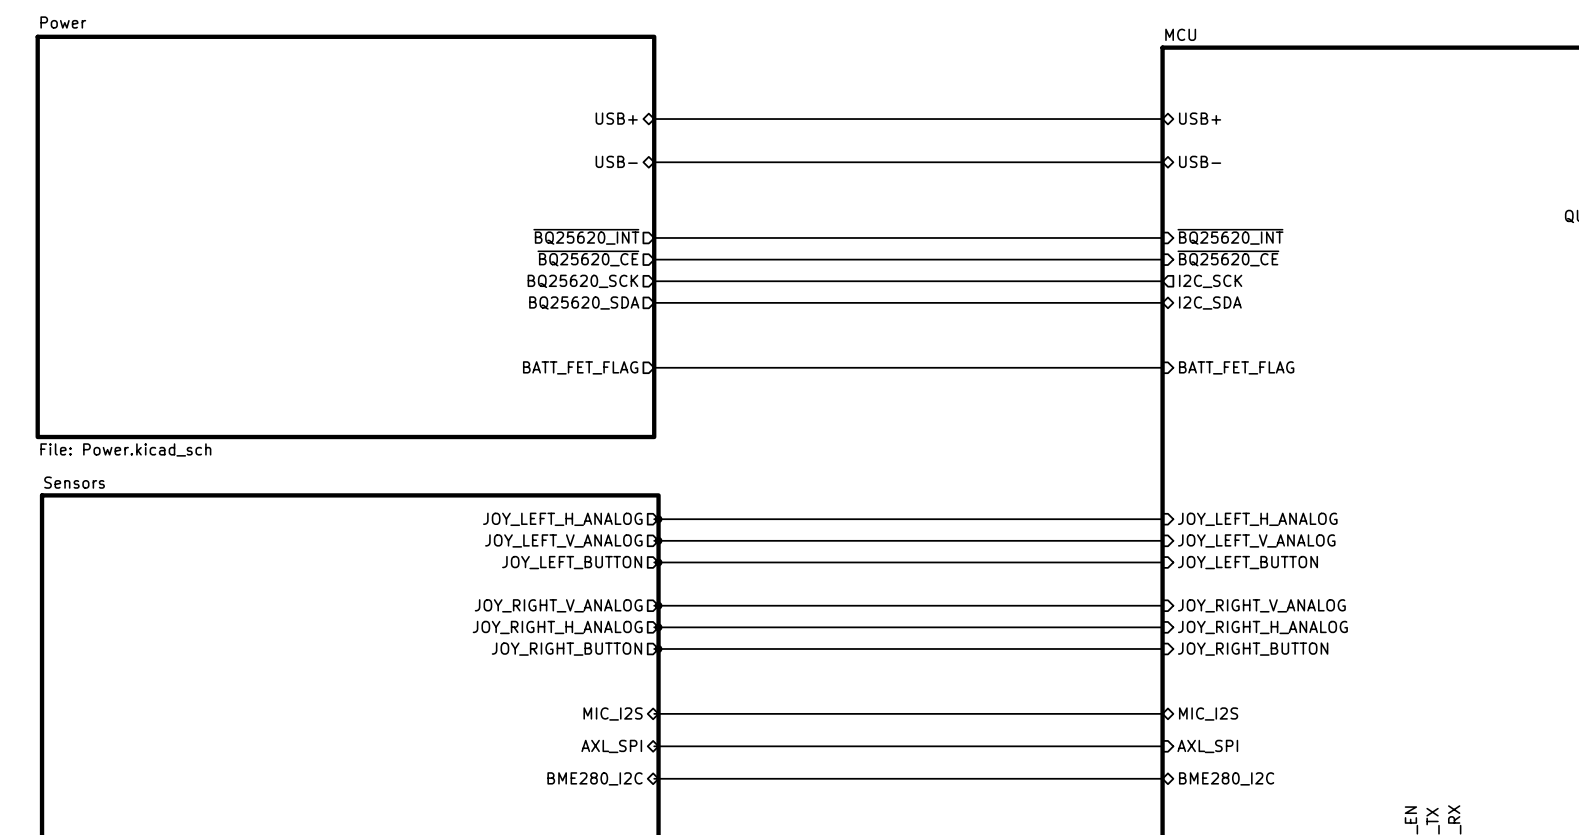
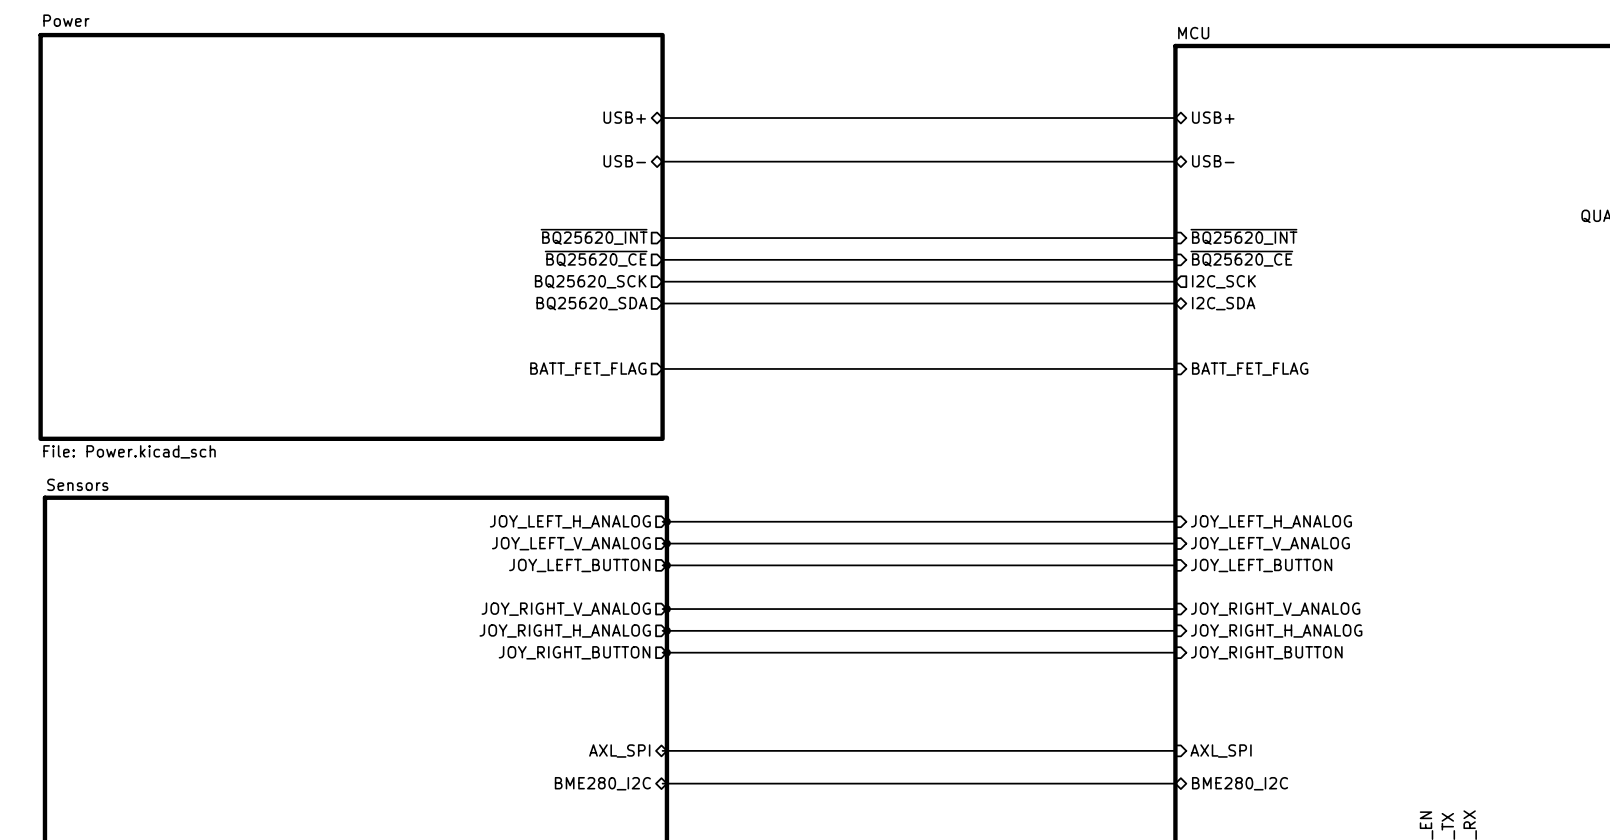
bus: (654, 713) (1162, 713) -> none
sheet pin: MIC_I2S (613, 714) -> none
sheet pin: MIC_I2S (1208, 714) -> none

